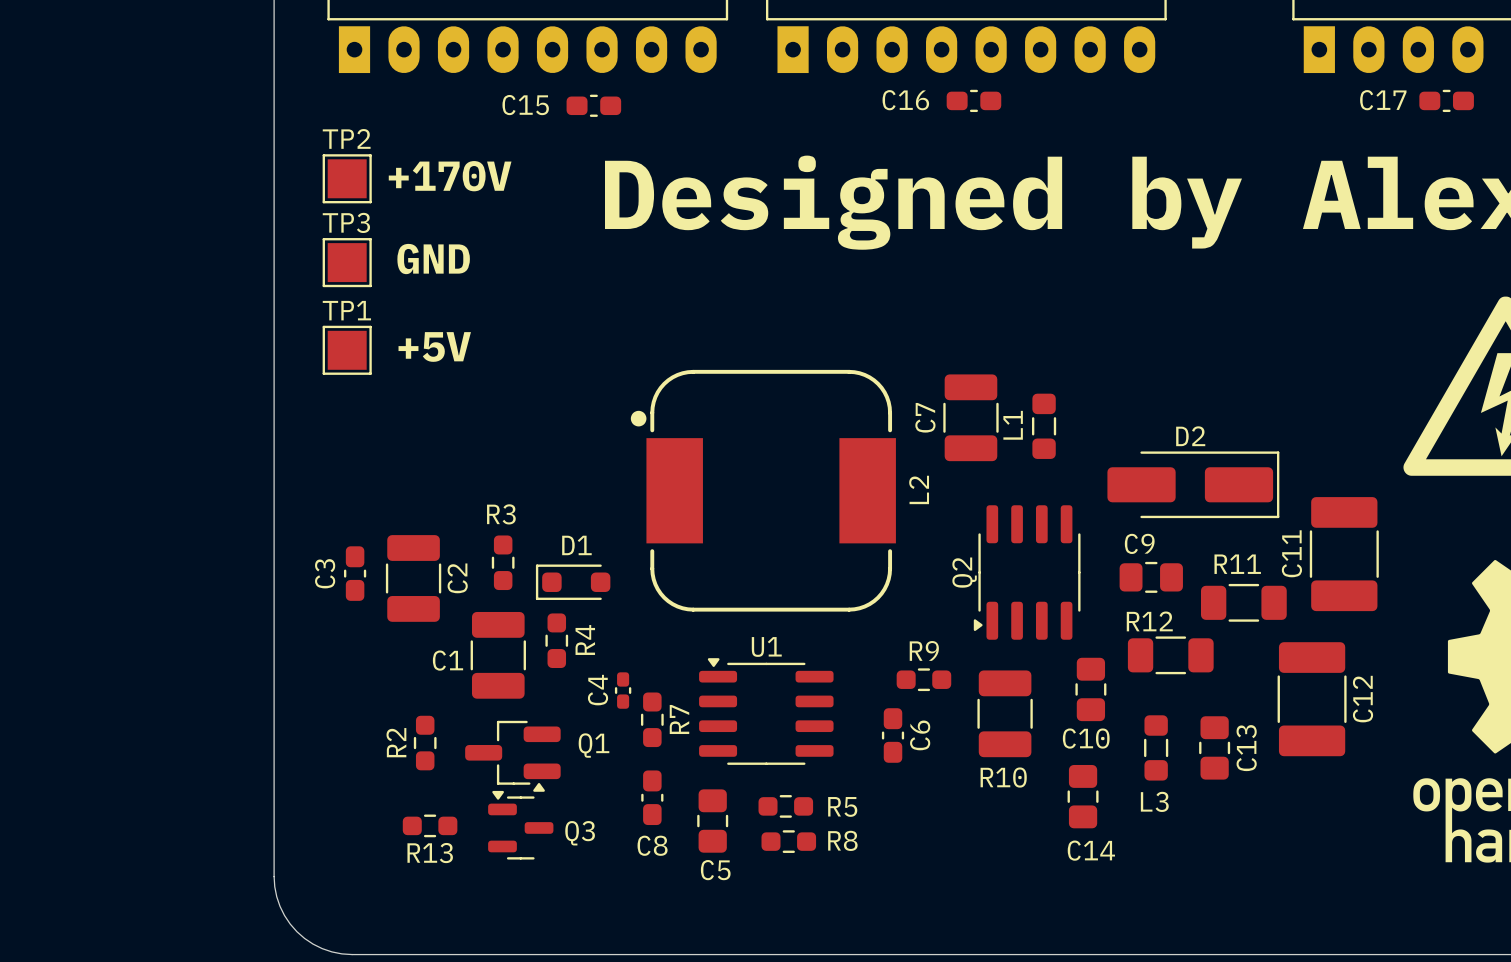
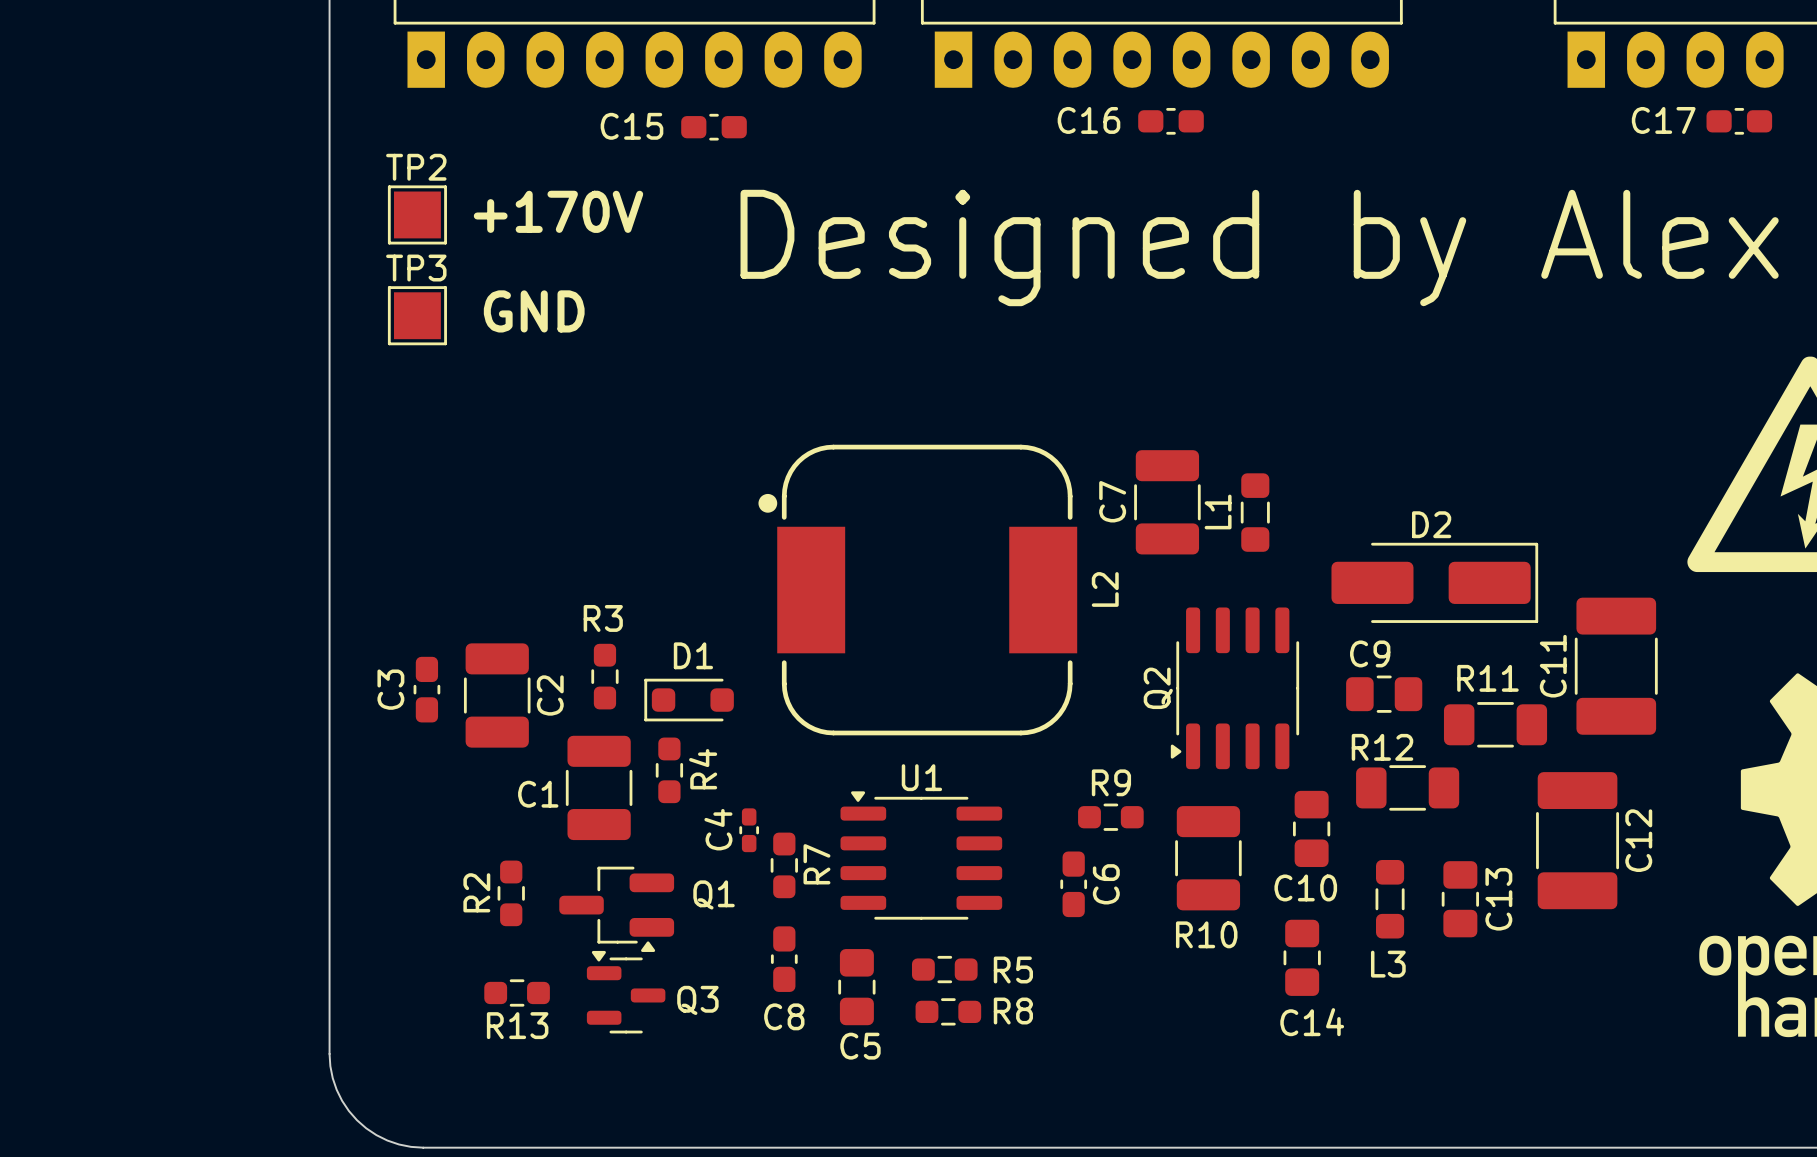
text: +5V (434, 346) -> none
TP1: (347, 350) -> none

